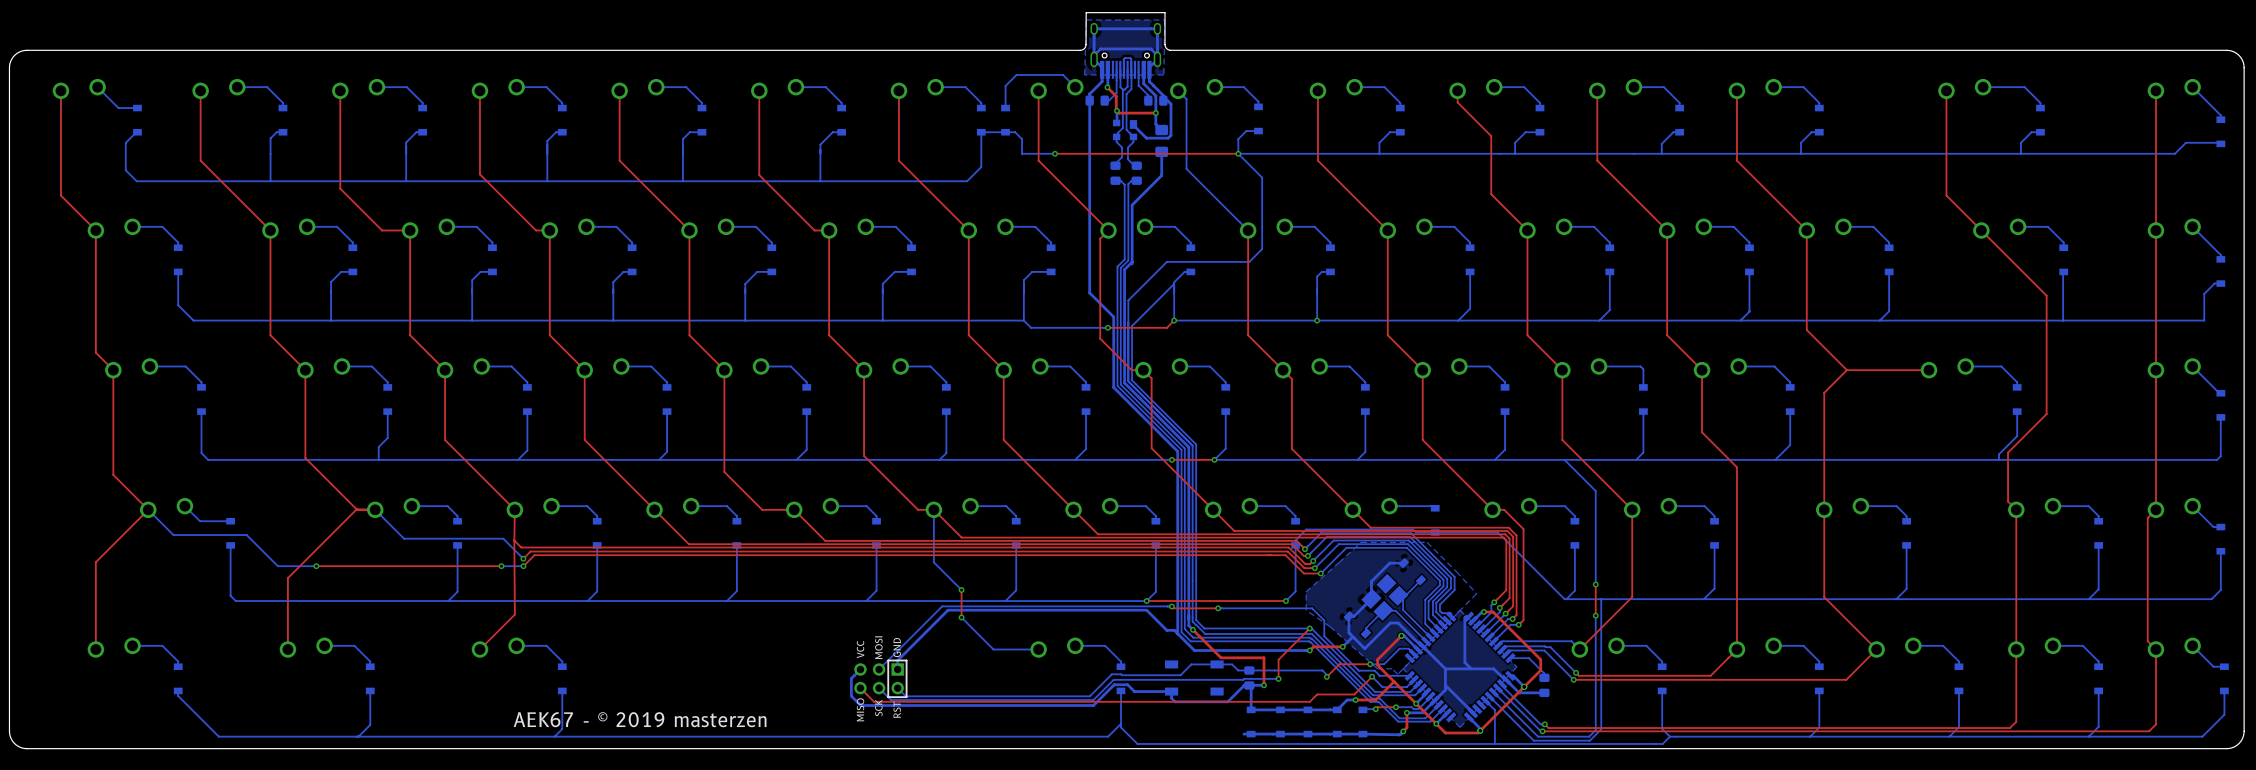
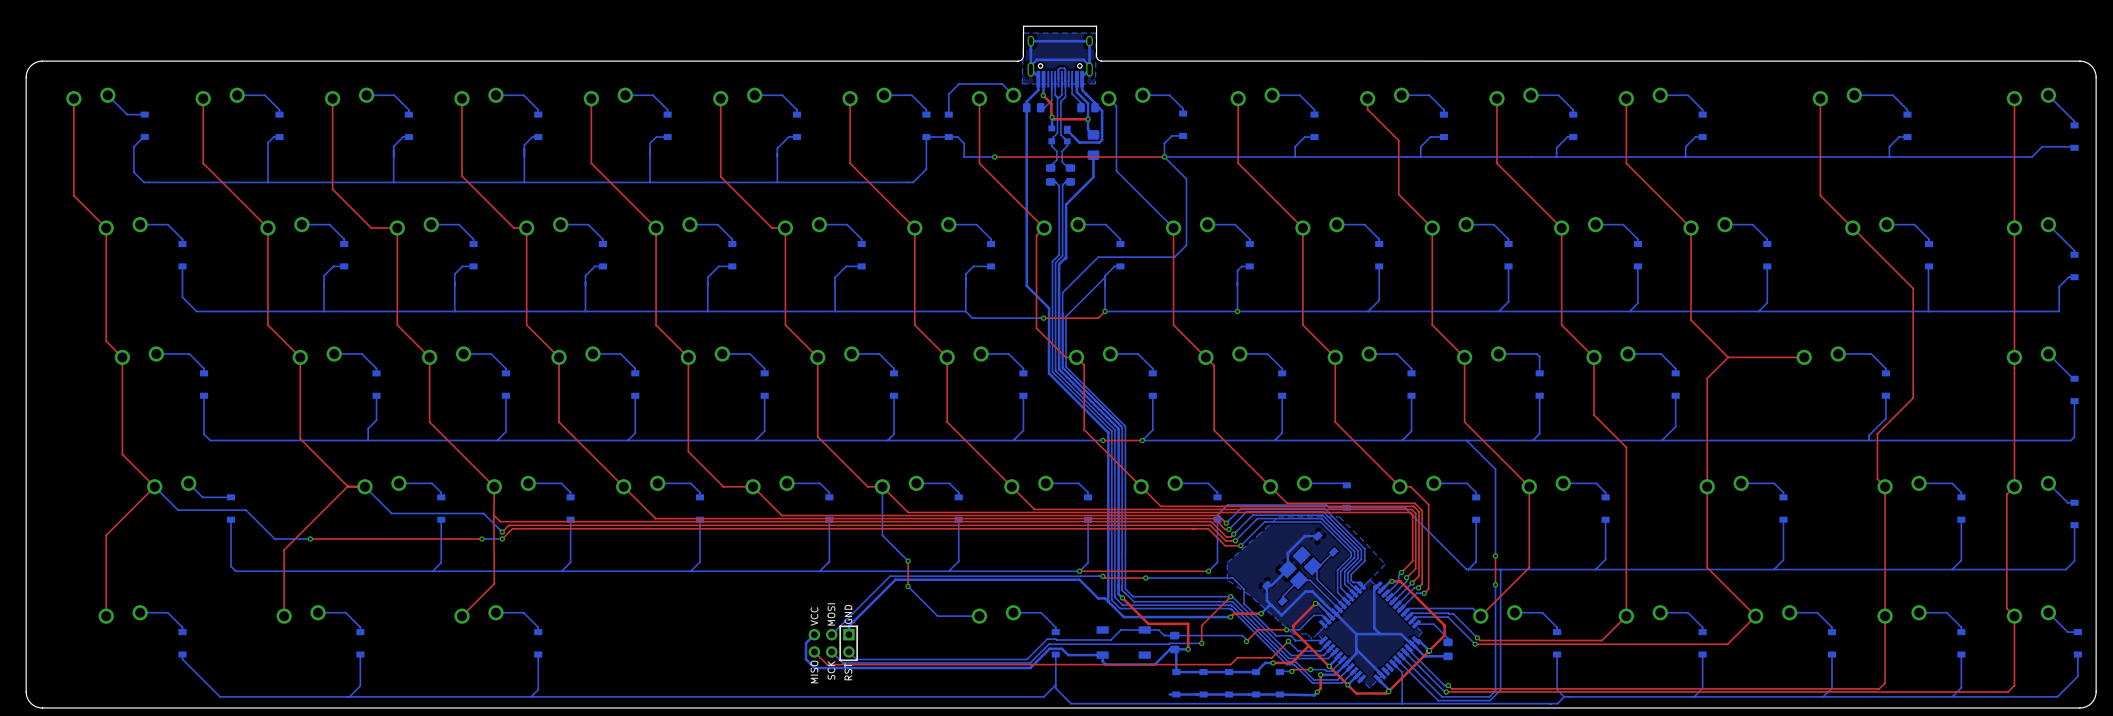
text: AEK67 - © 2019 masterzen (640, 719) -> none

